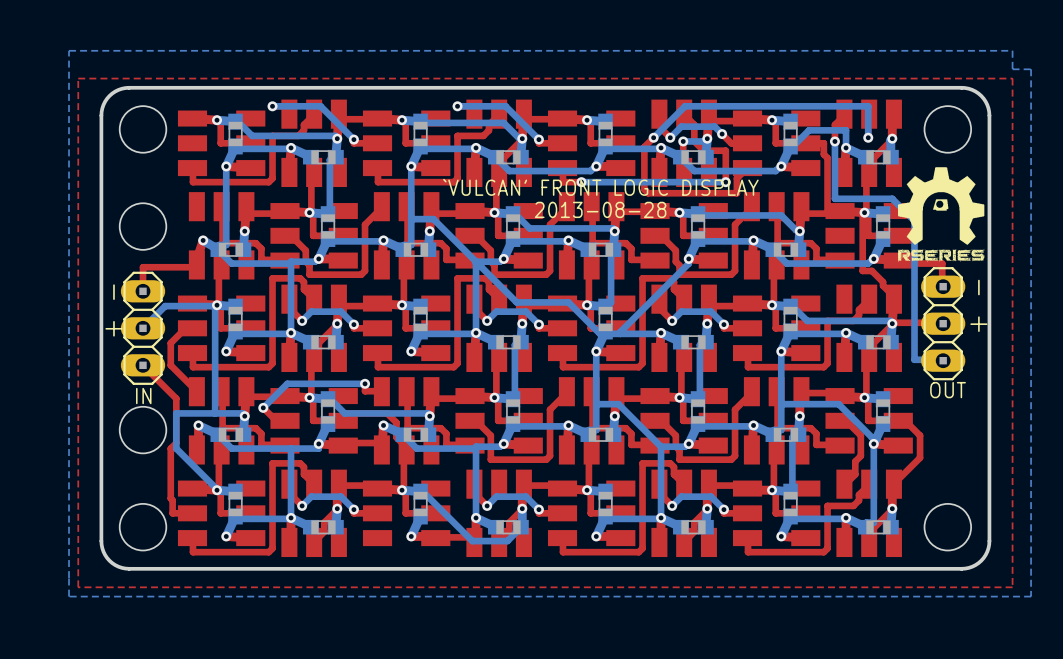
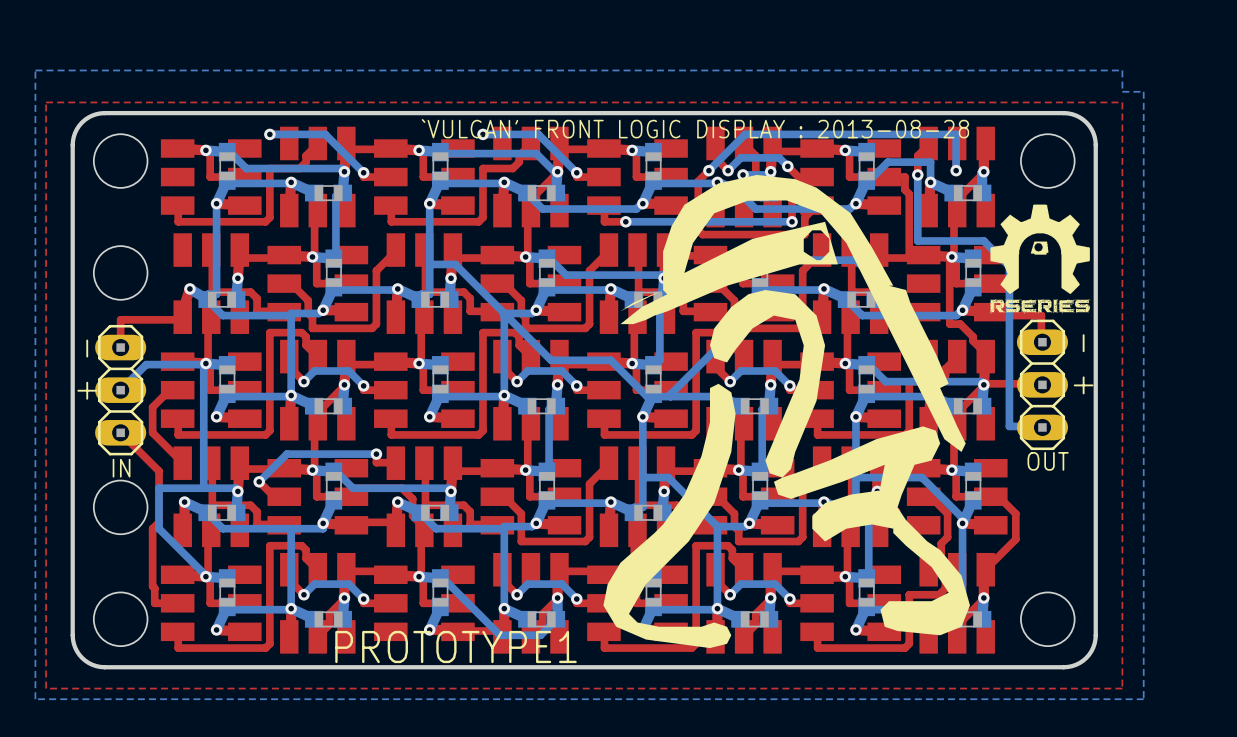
text: none -> `VULCAN' FRONT LOGIC DISPLAY : 2013-08-28 (695, 128)
drawing: none -> [603, 174, 971, 649]
text: `VULCAN' FRONT LOGIC DISPLAY (600, 187) -> none
text: 2013-08-28 (600, 209) -> none
text: none -> PROTOTYPE1 (456, 647)

